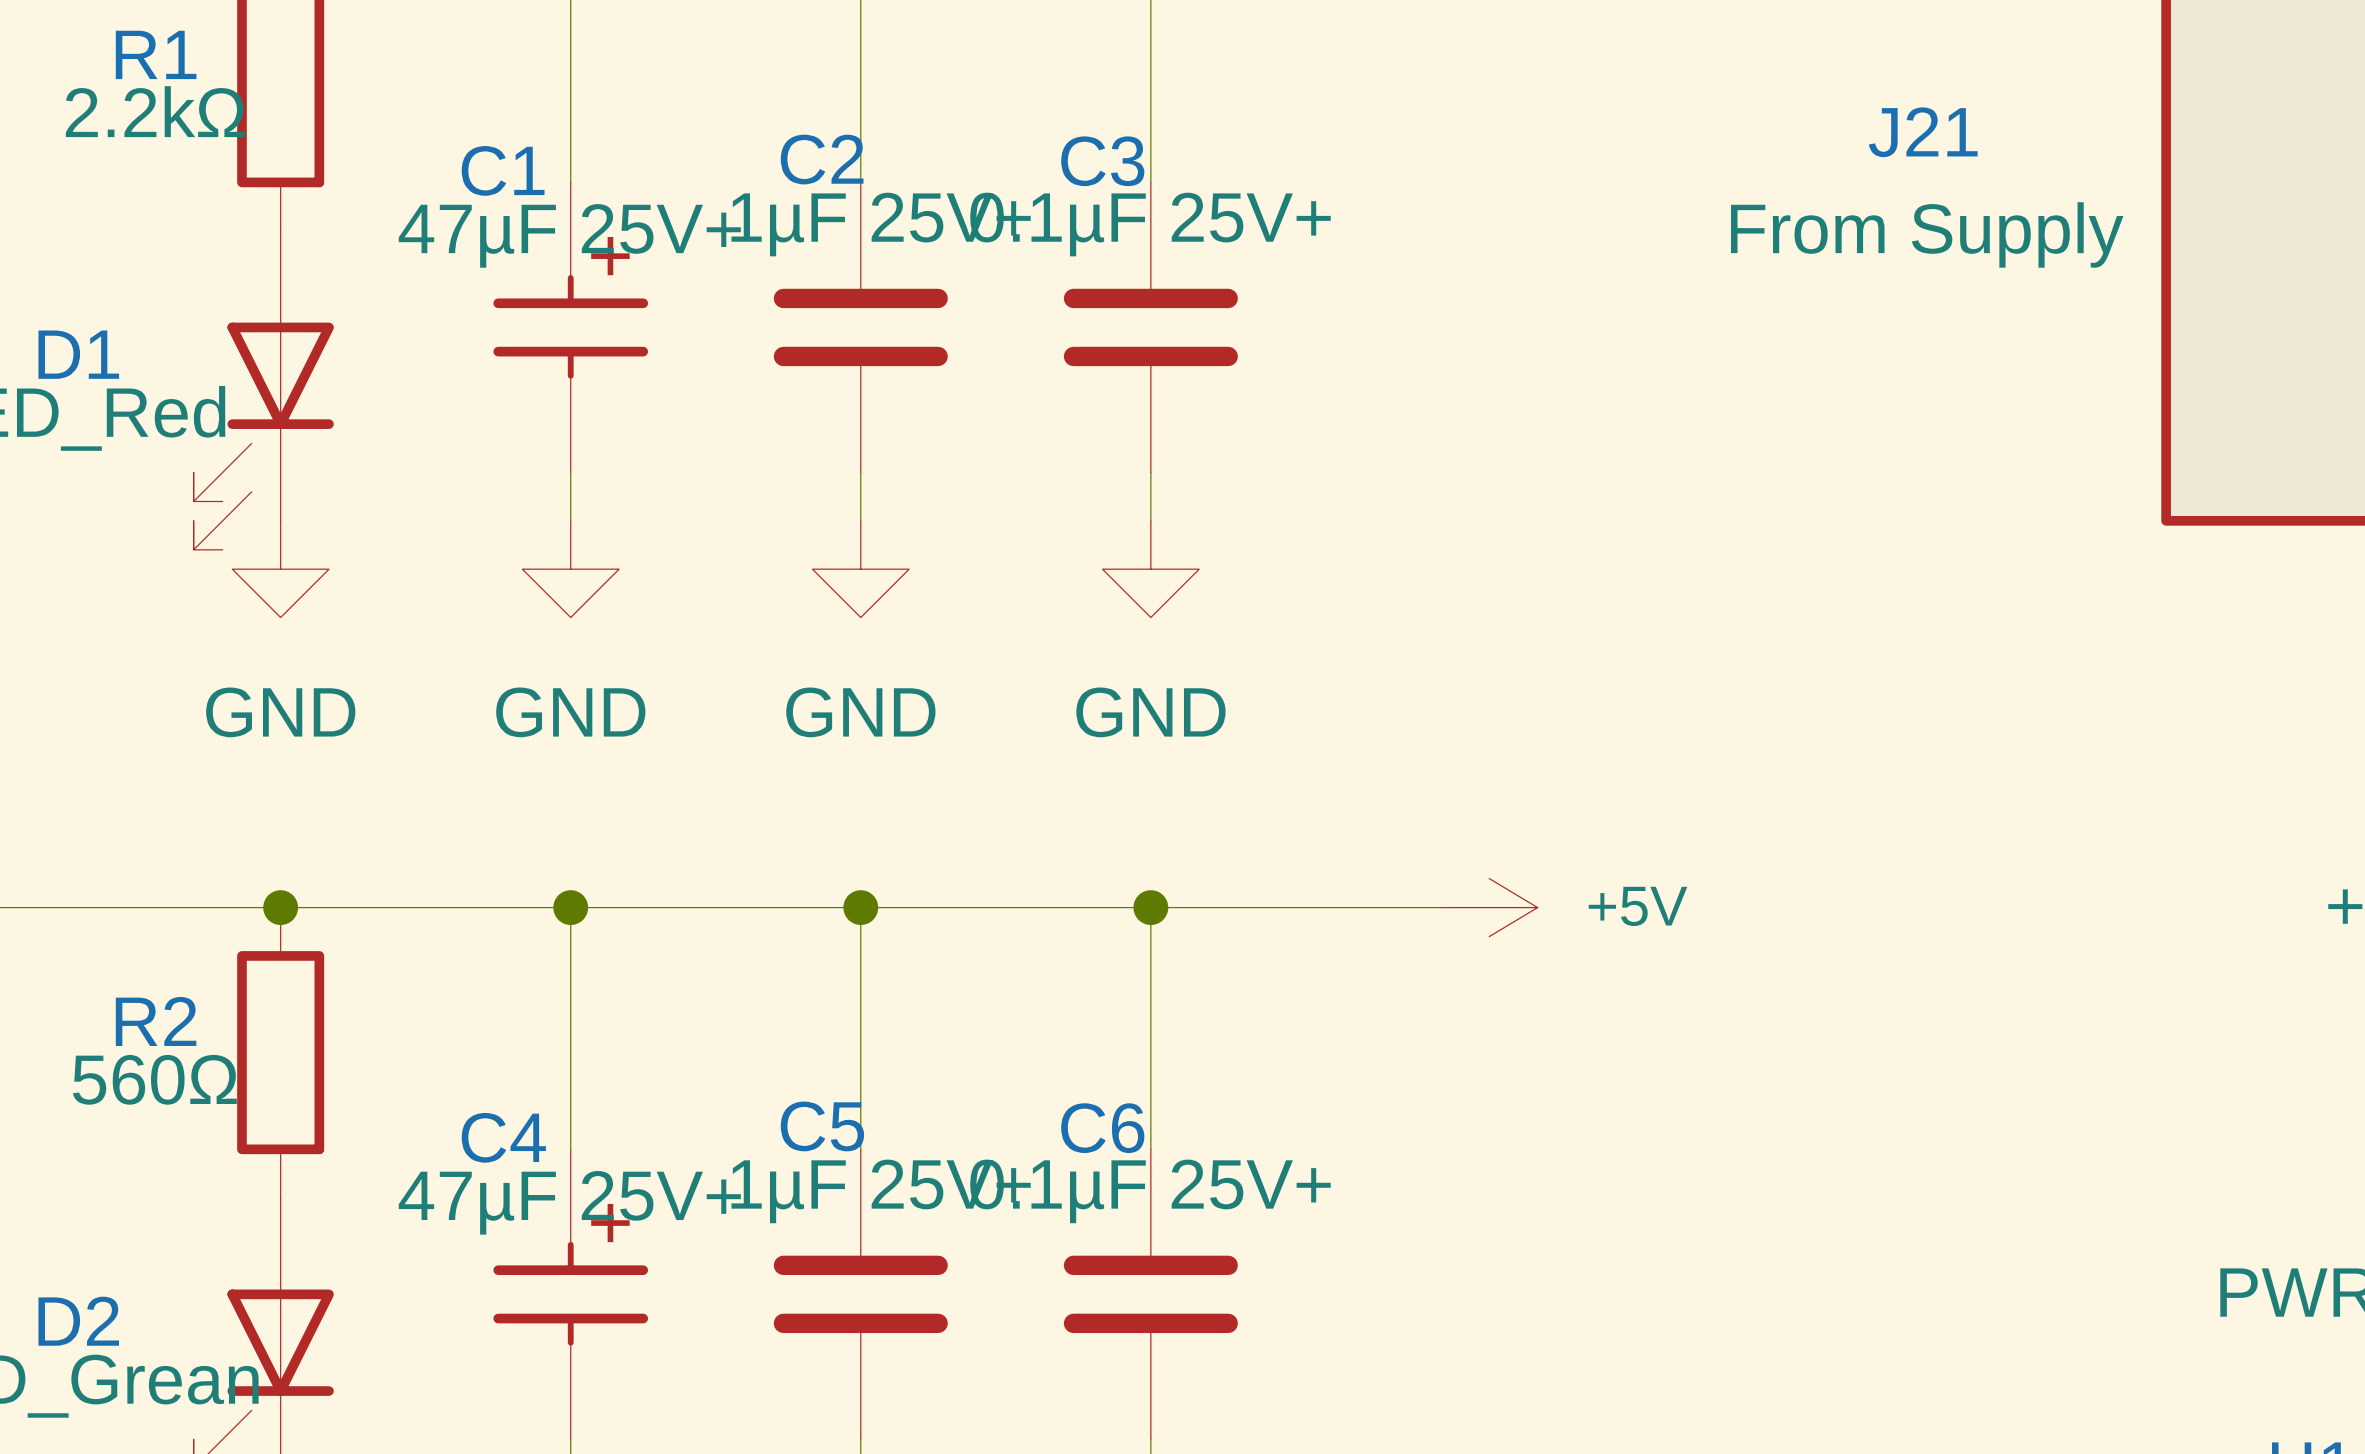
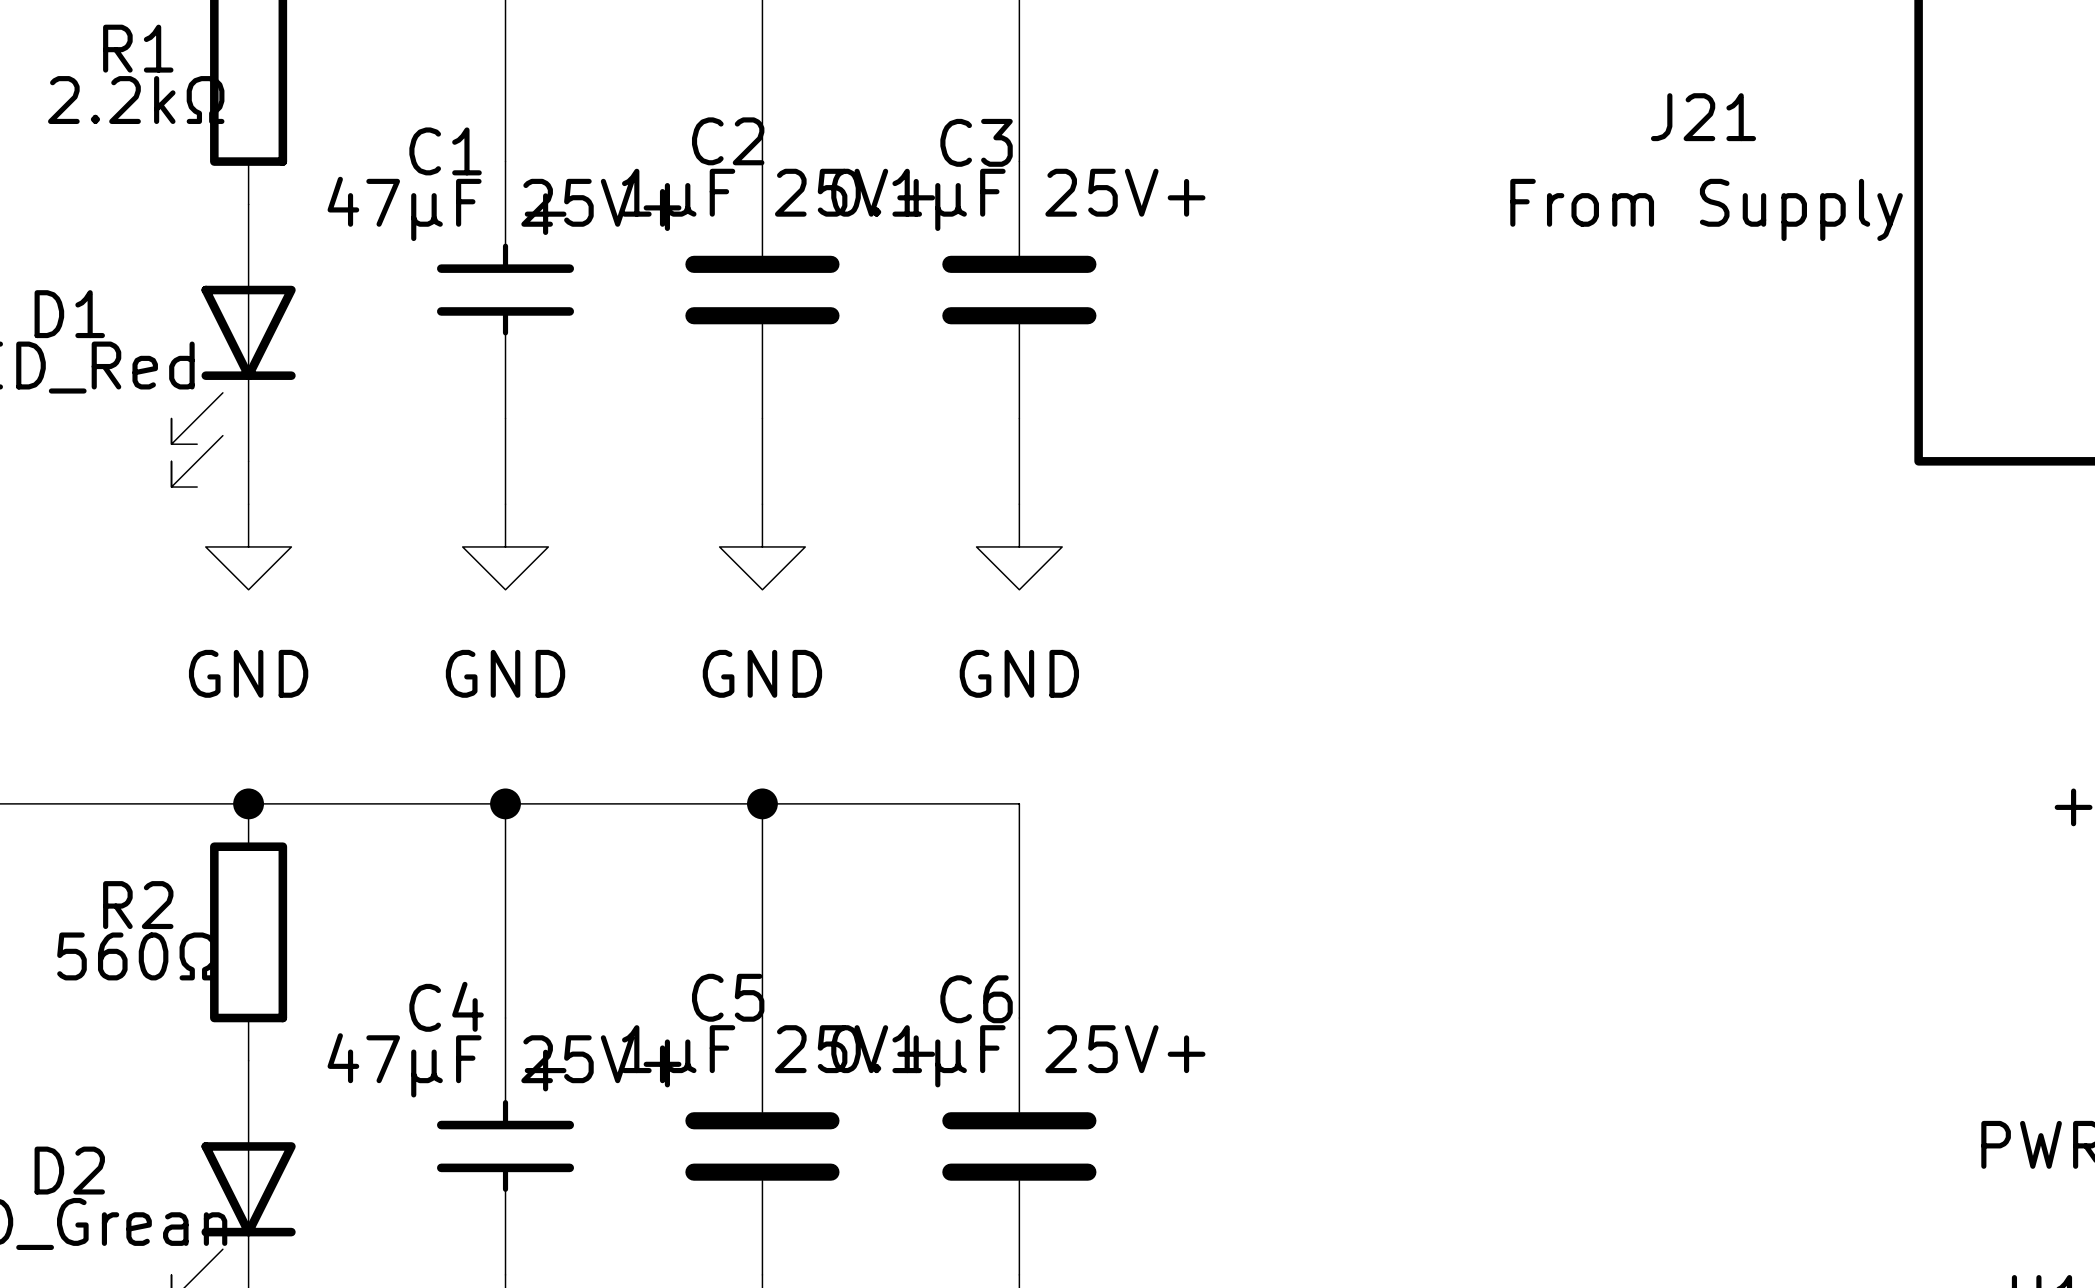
power symbol position: GND (280, 569) -> GND (248, 546)
power symbol position: GND (570, 569) -> GND (505, 546)
power symbol position: GND (860, 569) -> GND (762, 546)
power symbol position: GND (1150, 569) -> GND (1019, 546)
wire: (1150, 907) (1440, 907) -> none
junction: (1150, 907) -> none
power symbol: +5V (1489, 907) -> none

